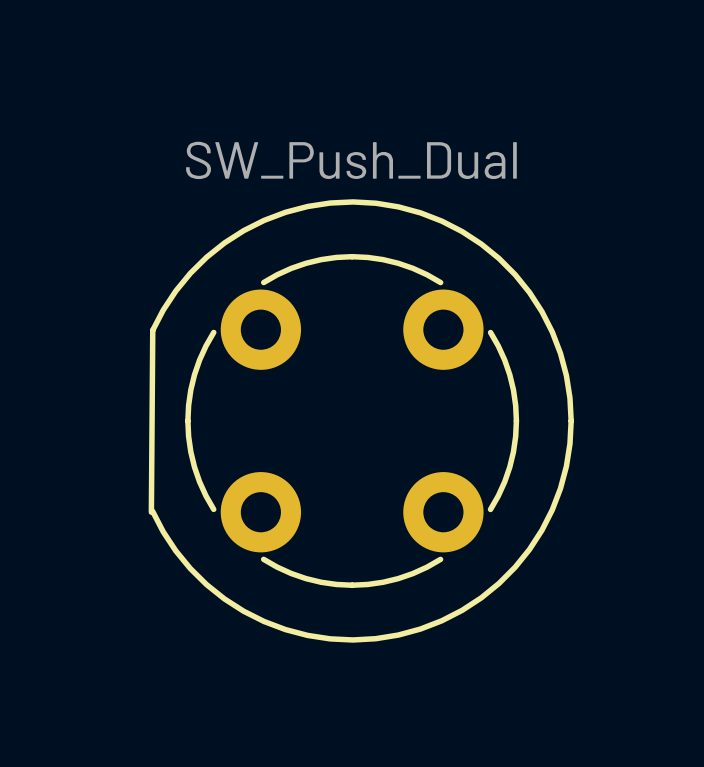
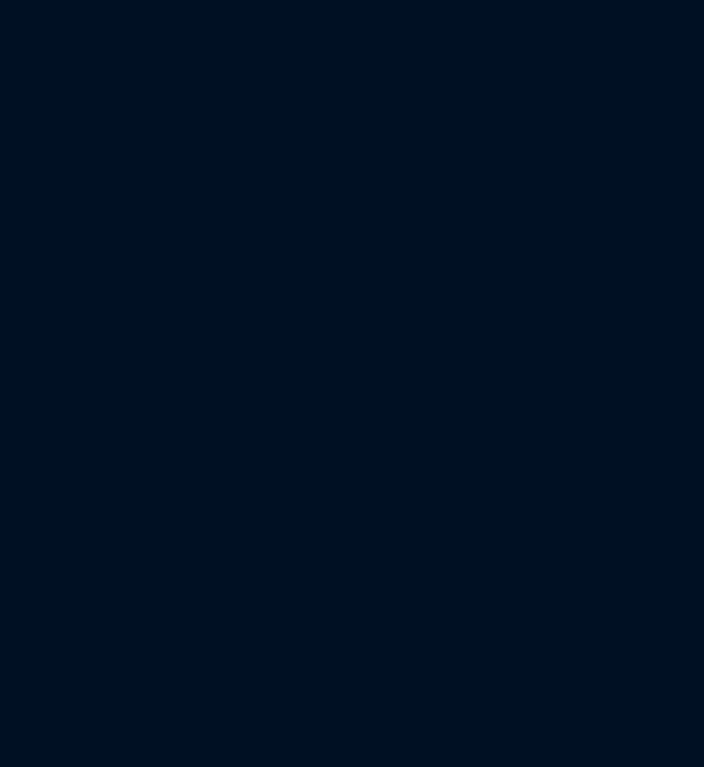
part: SW_Push_Dual (361, 420) -> none

